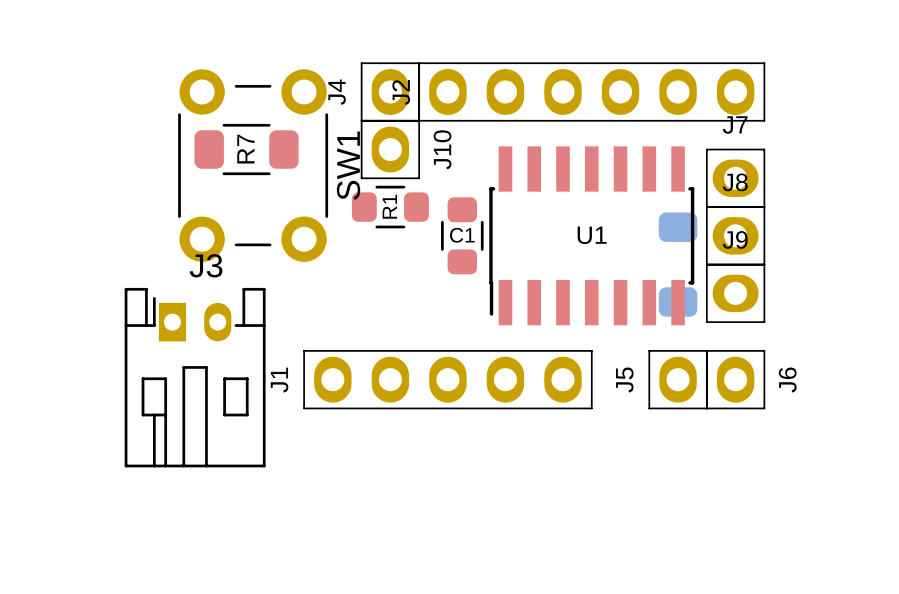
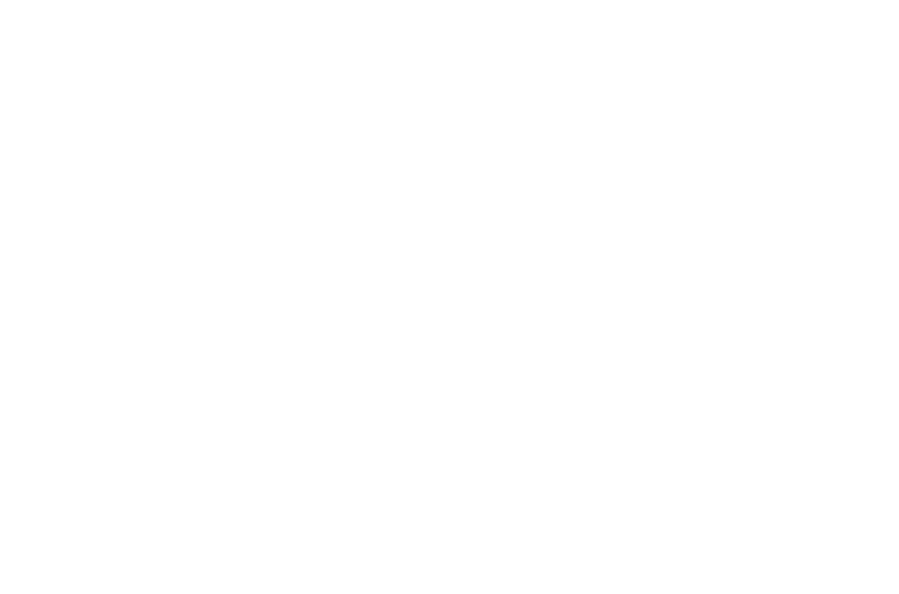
J4: (390, 91) -> none
J2: (591, 91) -> none
R7: (246, 149) -> none
J10: (390, 149) -> none
SW1: (253, 165) -> none
J7: (735, 178) -> none
R1: (390, 207) -> none
C1: (462, 235) -> none
U1: (591, 235) -> none
J8: (735, 235) -> none
part: (678, 264) -> none
J9: (735, 293) -> none
J3: (195, 377) -> none
J1: (447, 379) -> none
J5: (678, 379) -> none
J6: (735, 379) -> none

